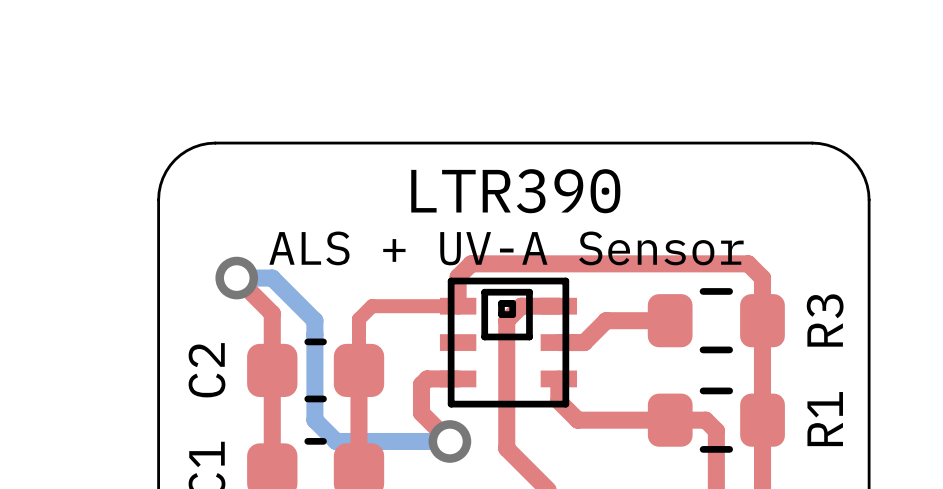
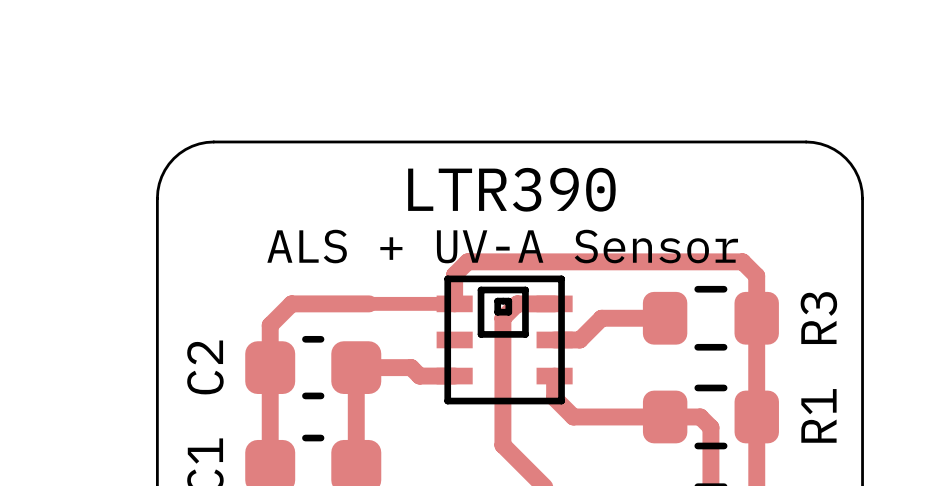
top track: (236, 278) (272, 313) (272, 327) -> (369, 303) (291, 303) (270, 325)
bottom track: (236, 278) (272, 278) (314, 320) (314, 420) (336, 441) (449, 441) -> none
via: (236, 278) -> none
top track: (372, 306) (358, 319) (358, 370) -> (423, 376) (419, 376) (411, 367) (356, 367)
top track: (427, 378) (421, 384) (421, 413) (449, 441) -> none
via: (449, 441) -> none

